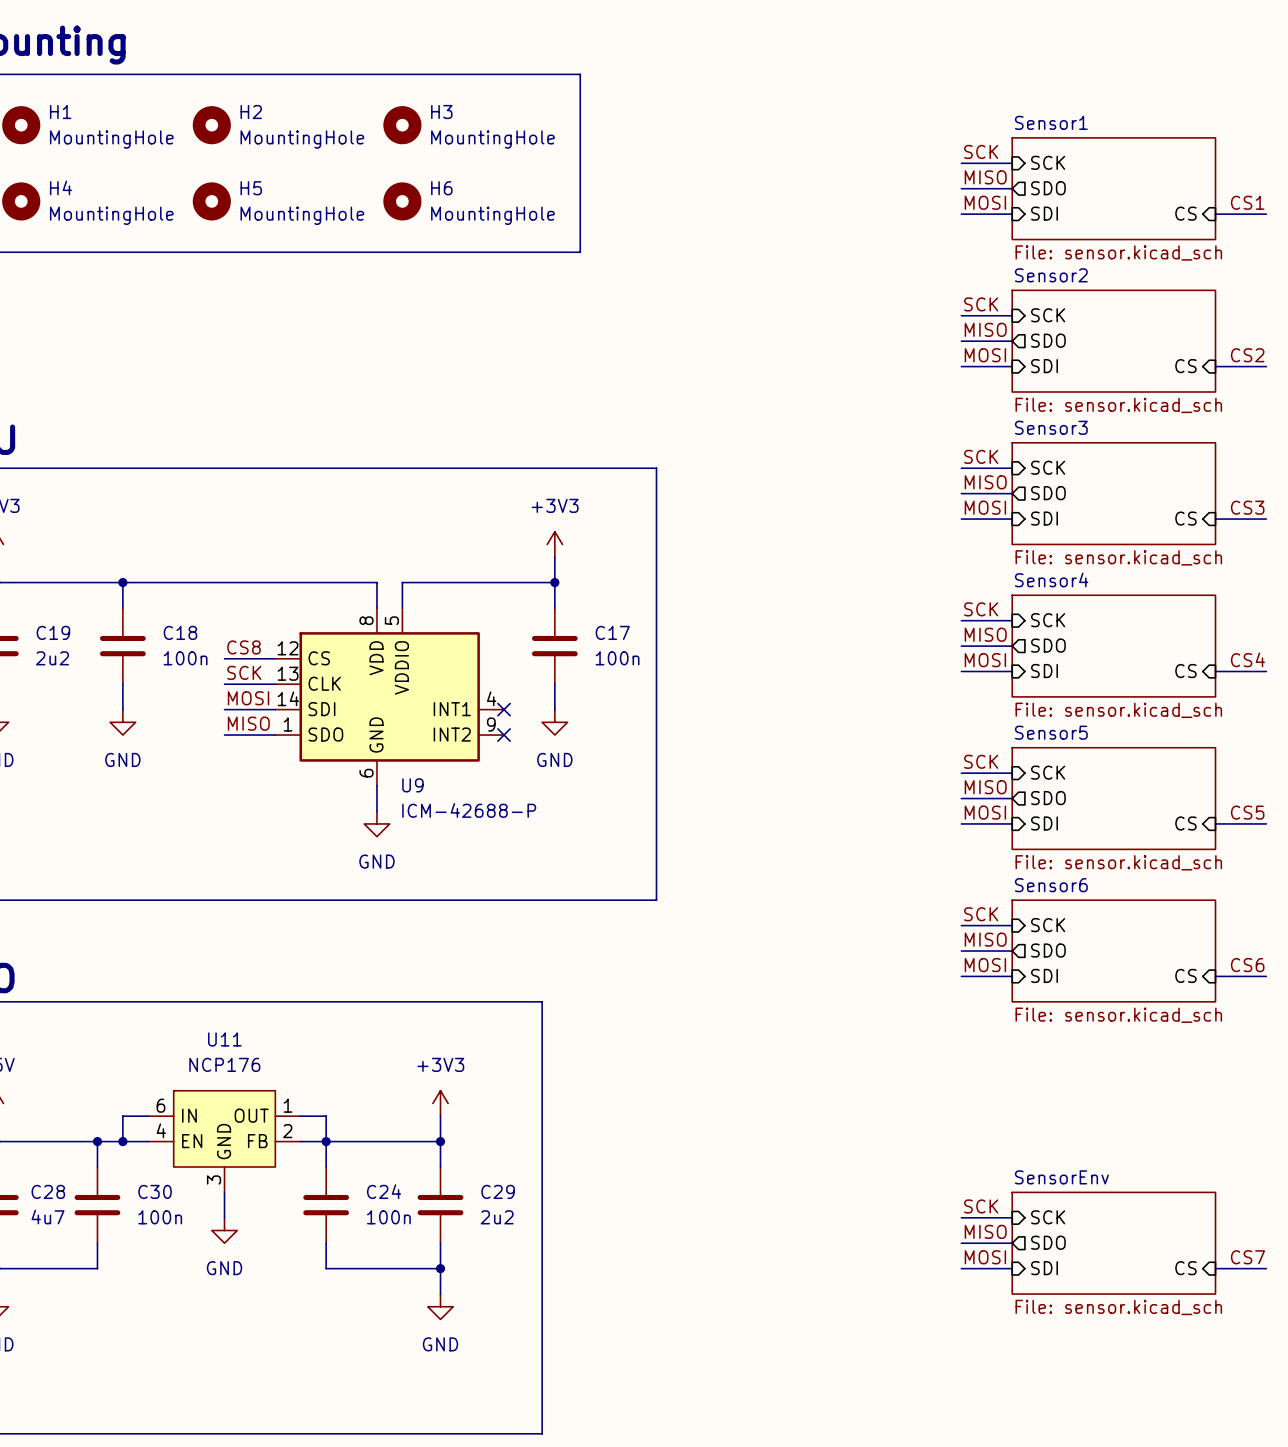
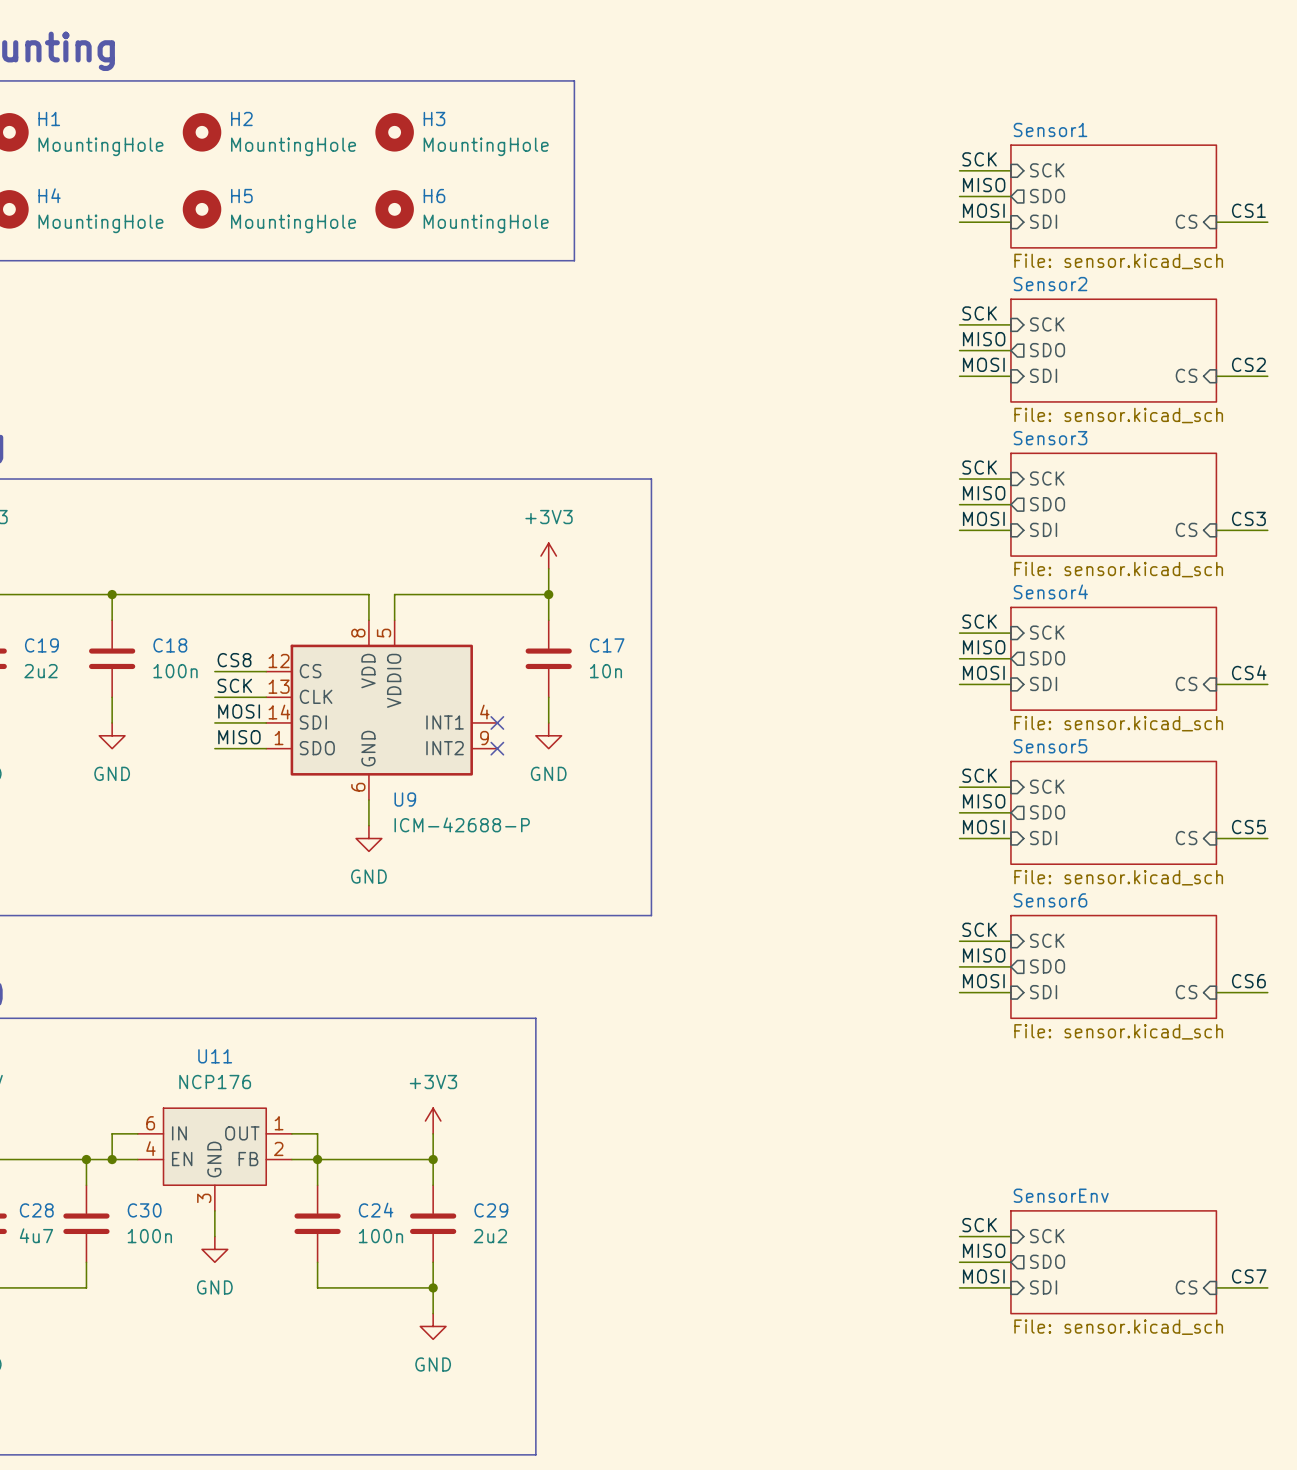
C17 value: 100n (617, 658) -> 10n (605, 671)

